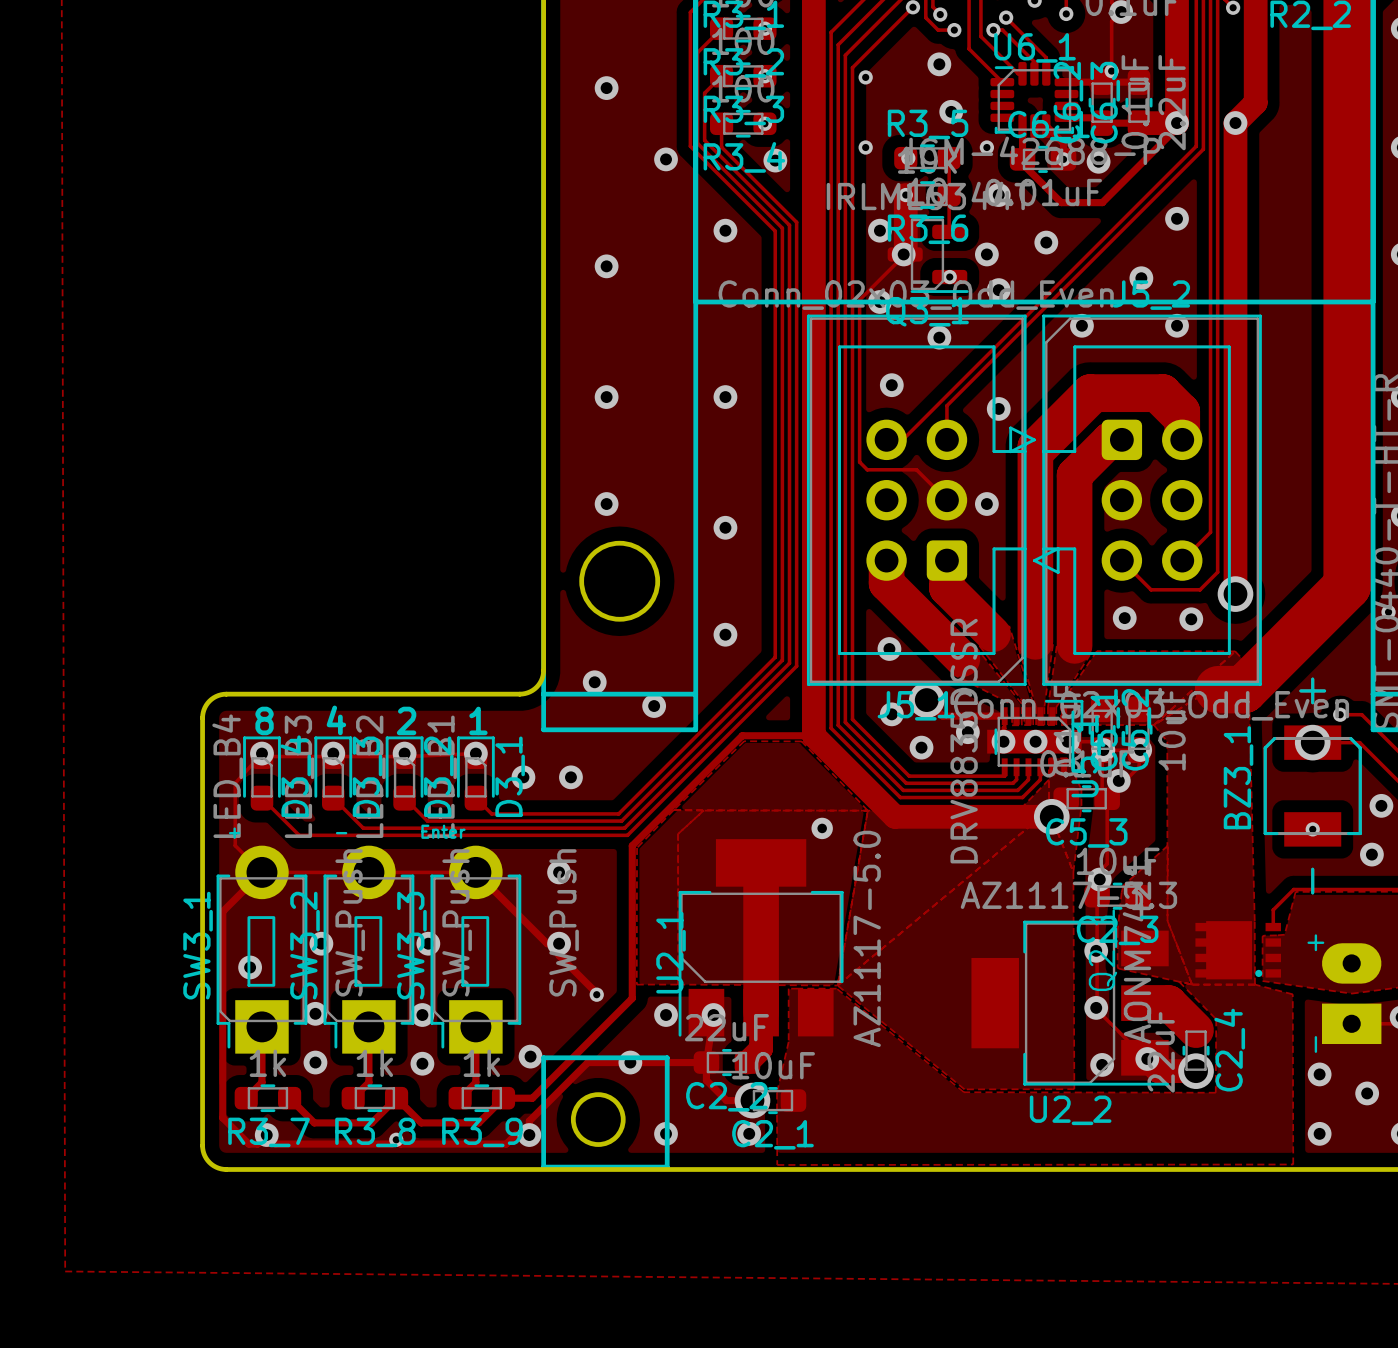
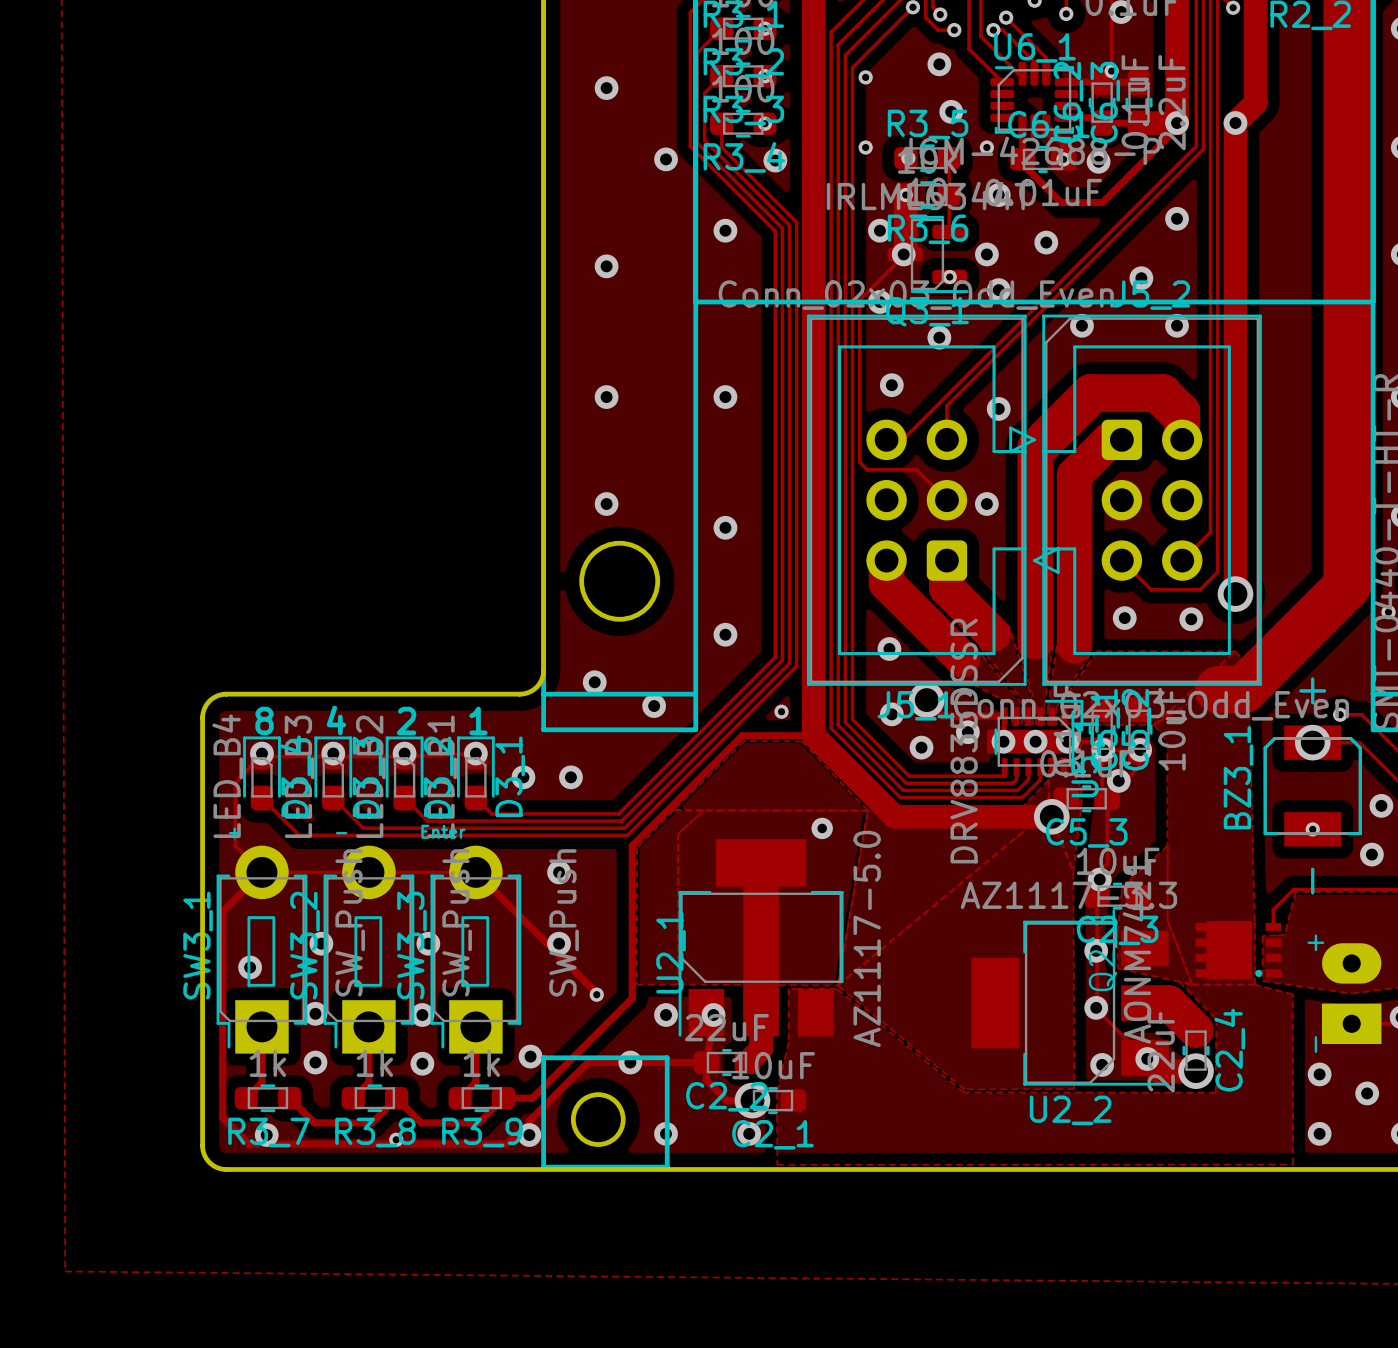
via: none -> (781, 711)

